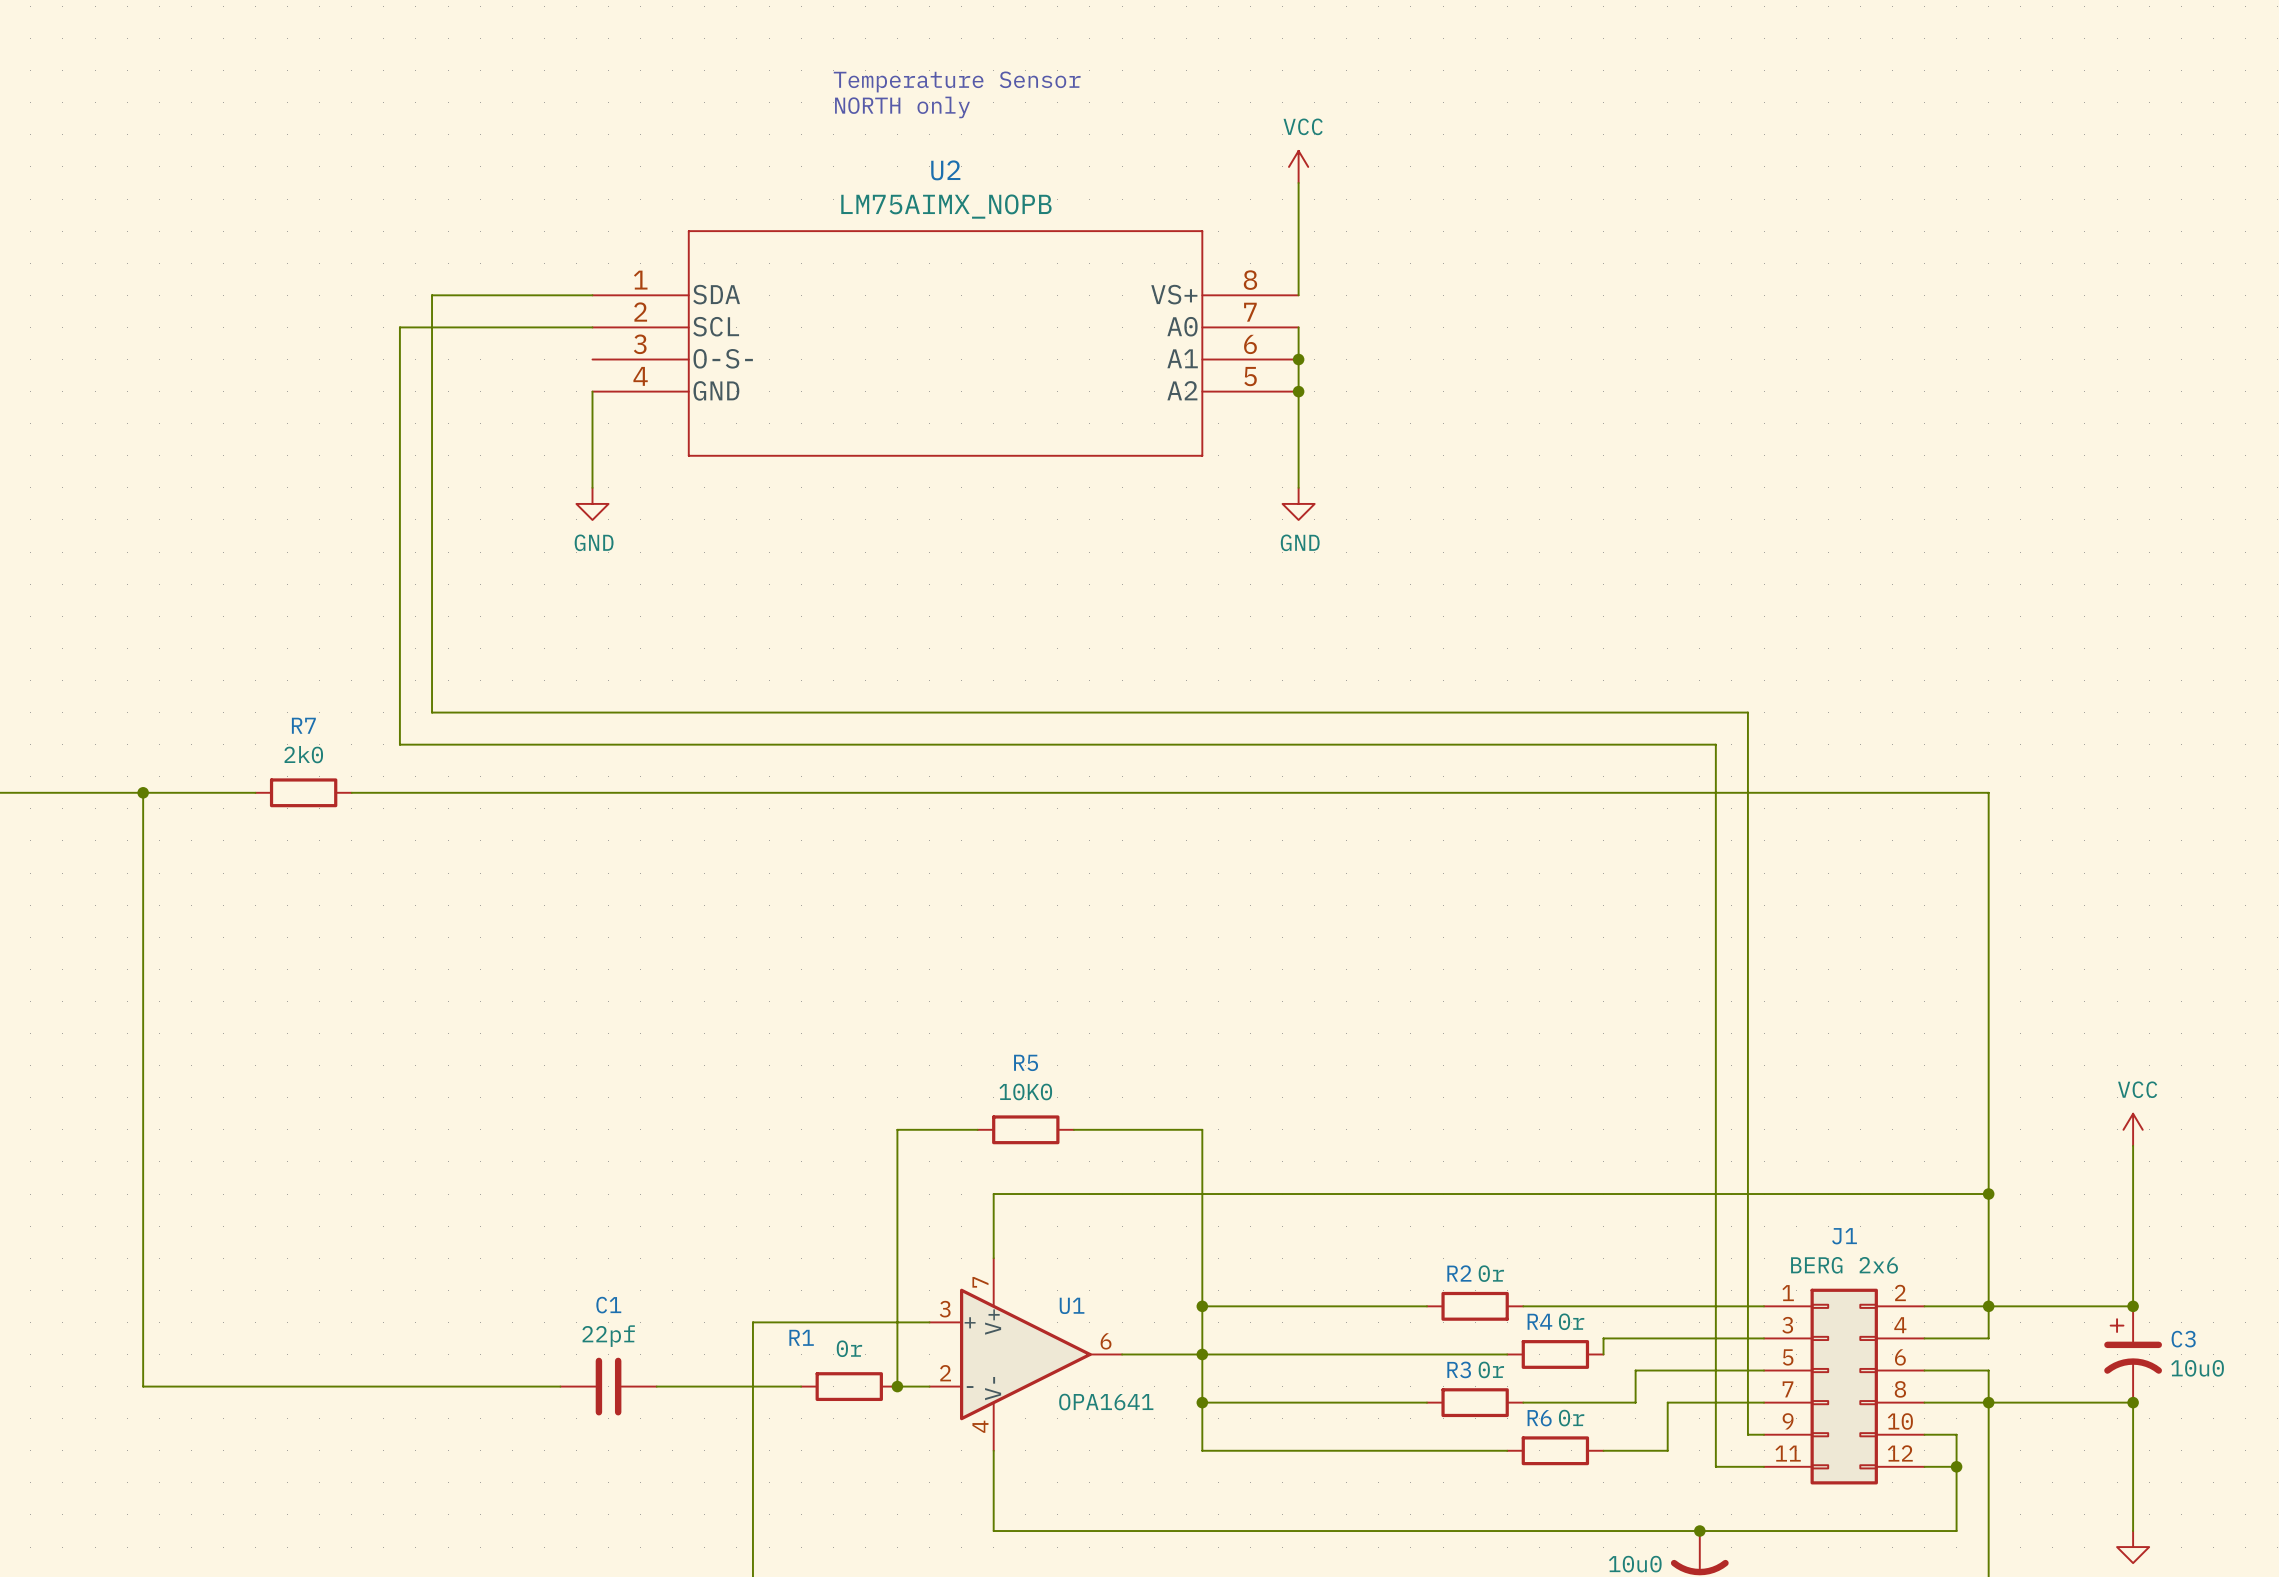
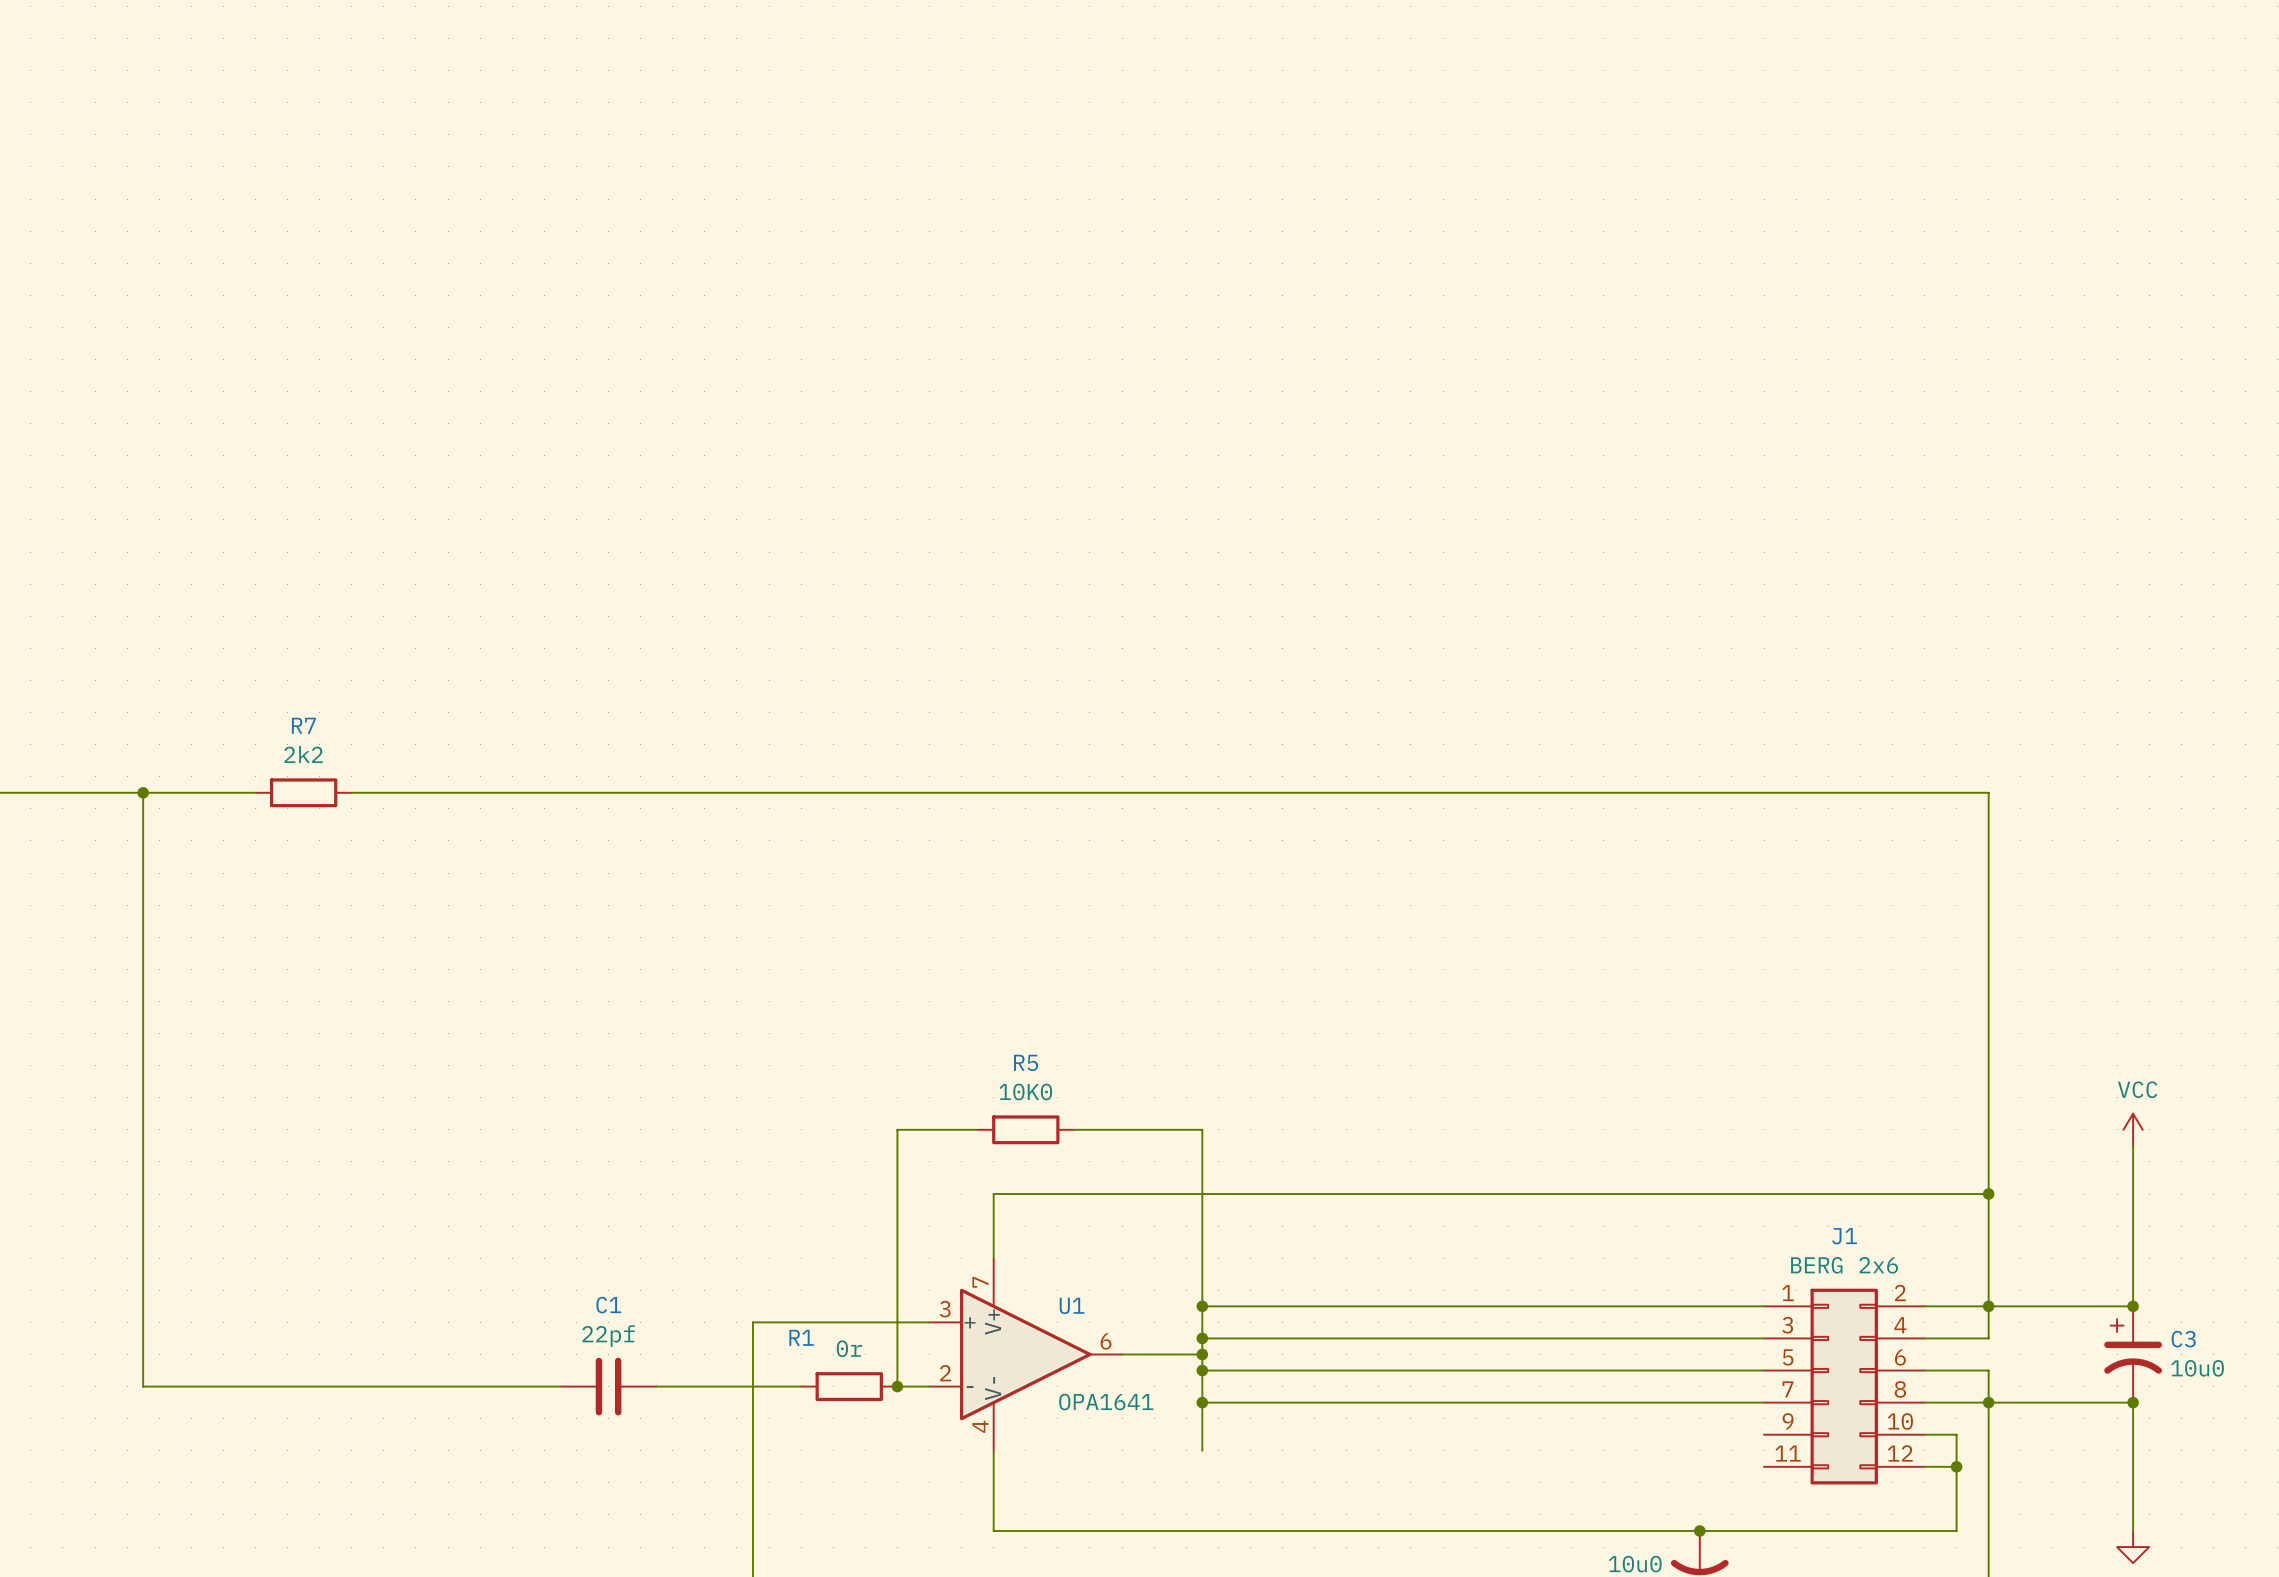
text: Temperature Sensor (957, 81) -> none
text: NORTH only (902, 107) -> none
power symbol: VCC (1298, 166) -> none
wire: (1298, 182) (1298, 295) -> none
wire: (592, 295) (432, 295) (432, 712) (1747, 712) (1747, 1434) (1764, 1434) -> none
wire: (592, 327) (399, 327) (399, 744) (1715, 744) (1715, 1466) (1764, 1466) -> none
wire: (1298, 327) (1298, 487) -> none
U2: LM75AIMX_NOPB (945, 343) -> none
junction: (1298, 359) -> none
wire: (592, 391) (592, 487) -> none
junction: (1298, 391) -> none
power symbol: GND (592, 503) -> none
power symbol: GND (1298, 503) -> none
R7 value: 2k0 (303, 754) -> 2k2 (303, 754)
wire: none -> (1426, 1306) (1523, 1306)
R2: 0r (1475, 1306) -> none
junction: none -> (1202, 1338)
wire: (1603, 1338) (1603, 1354) -> (1603, 1338) (1202, 1338)
wire: (1202, 1354) (1507, 1354) -> none
R4: 0r (1555, 1354) -> none
wire: none -> (1202, 1370) (1635, 1370)
junction: none -> (1202, 1370)
wire: (1635, 1370) (1635, 1402) -> (1667, 1402) (1635, 1402)
wire: none -> (1426, 1402) (1523, 1402)
R3: 0r (1475, 1402) -> none
wire: (1667, 1402) (1667, 1450) (1603, 1450) -> none
wire: (1202, 1450) (1507, 1450) -> none
R6: 0r (1555, 1450) -> none

